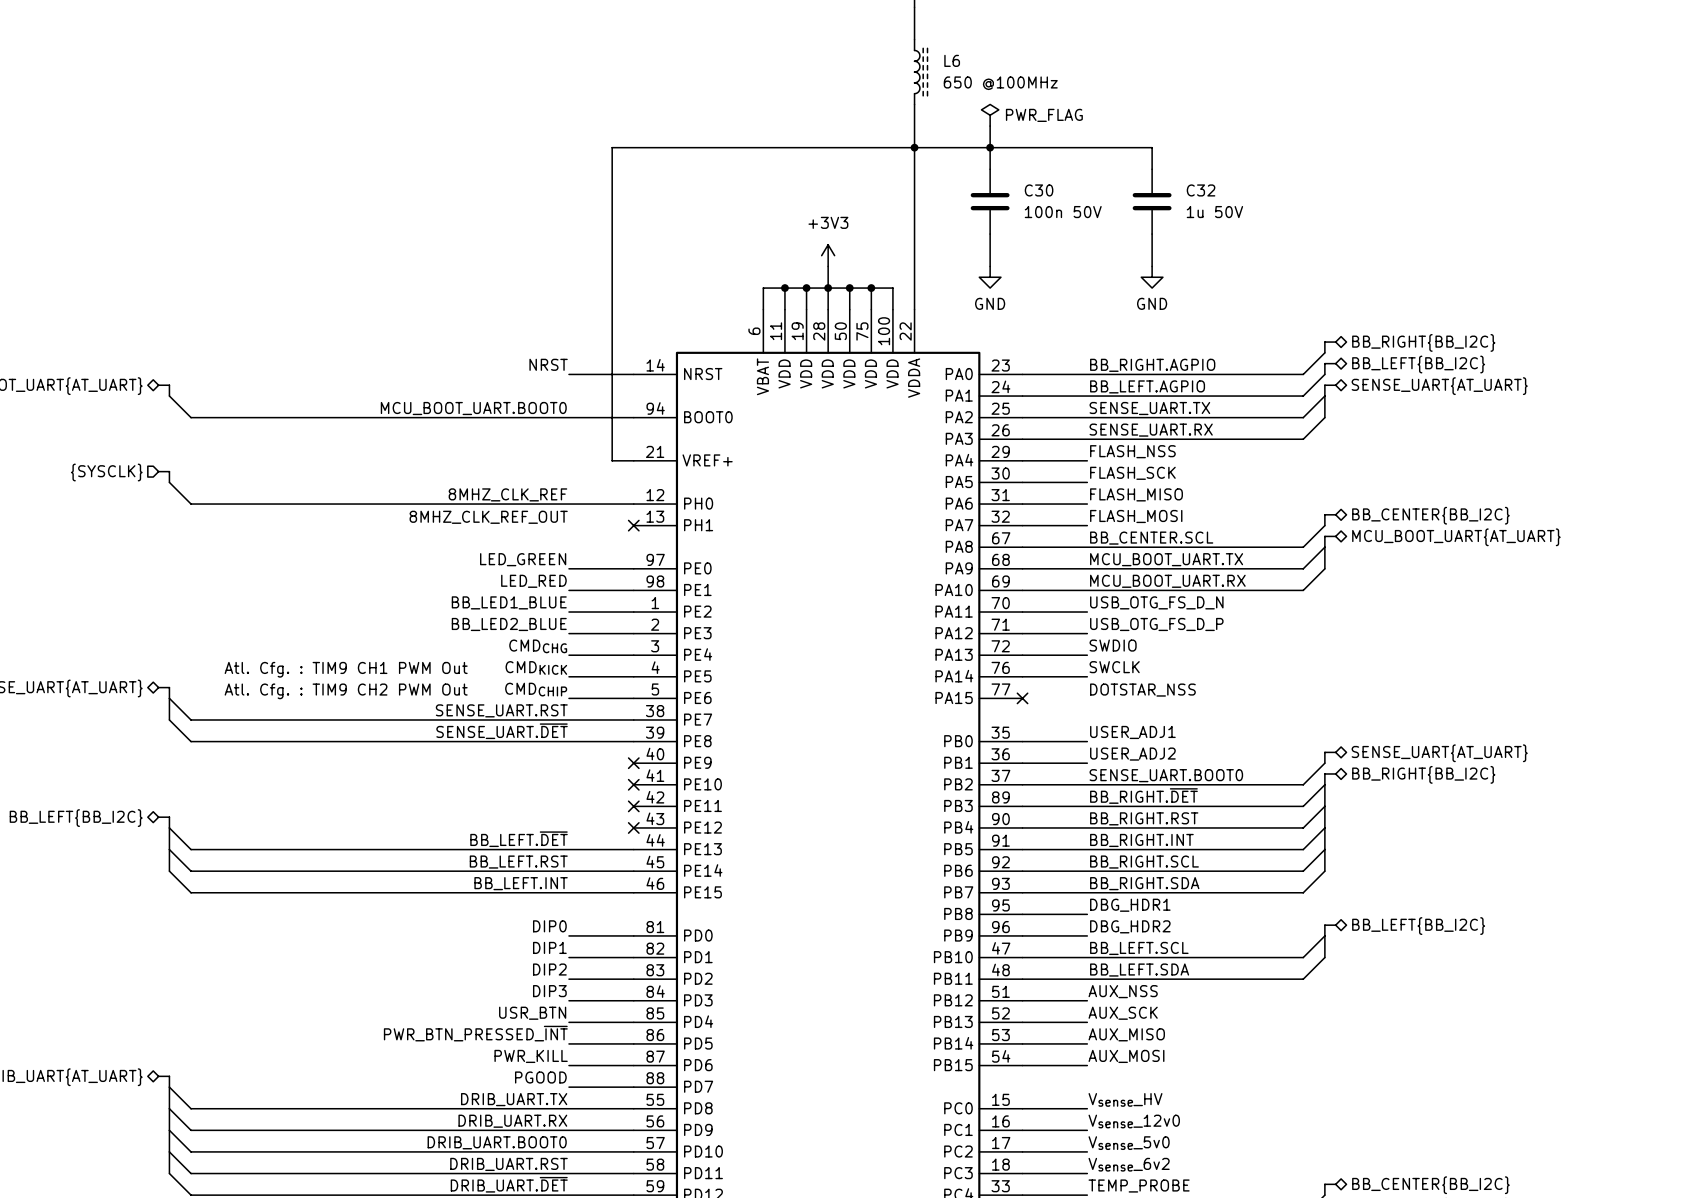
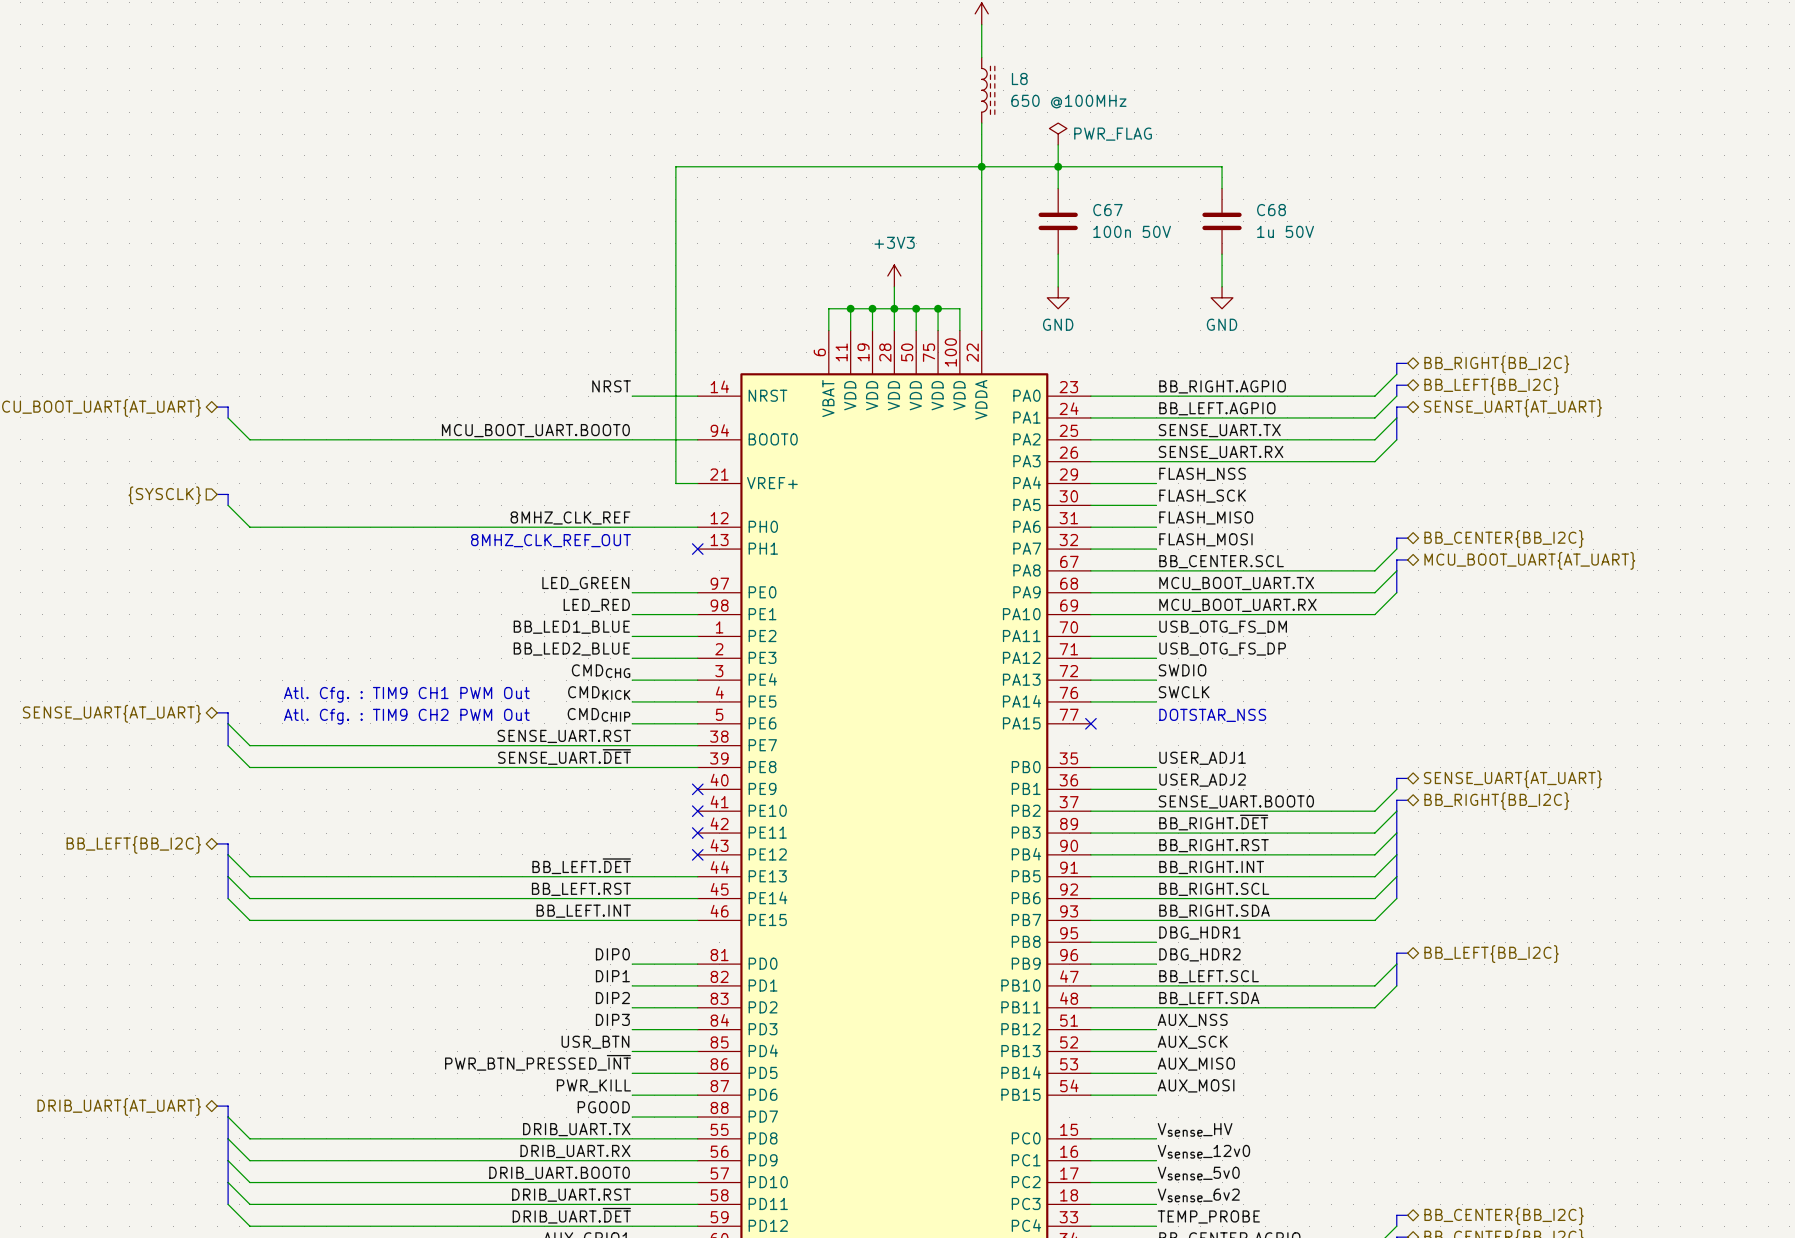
L6 name: L6 (952, 60) -> L8 (1019, 78)
C30 name: C30 (1039, 190) -> C67 (1107, 210)
C32 name: C32 (1201, 190) -> C68 (1271, 210)
label: USB_OTG_FS_D_N (1156, 602) -> USB_OTG_FS_DM (1223, 627)
label: USB_OTG_FS_D_P (1156, 624) -> USB_OTG_FS_DP (1222, 649)

